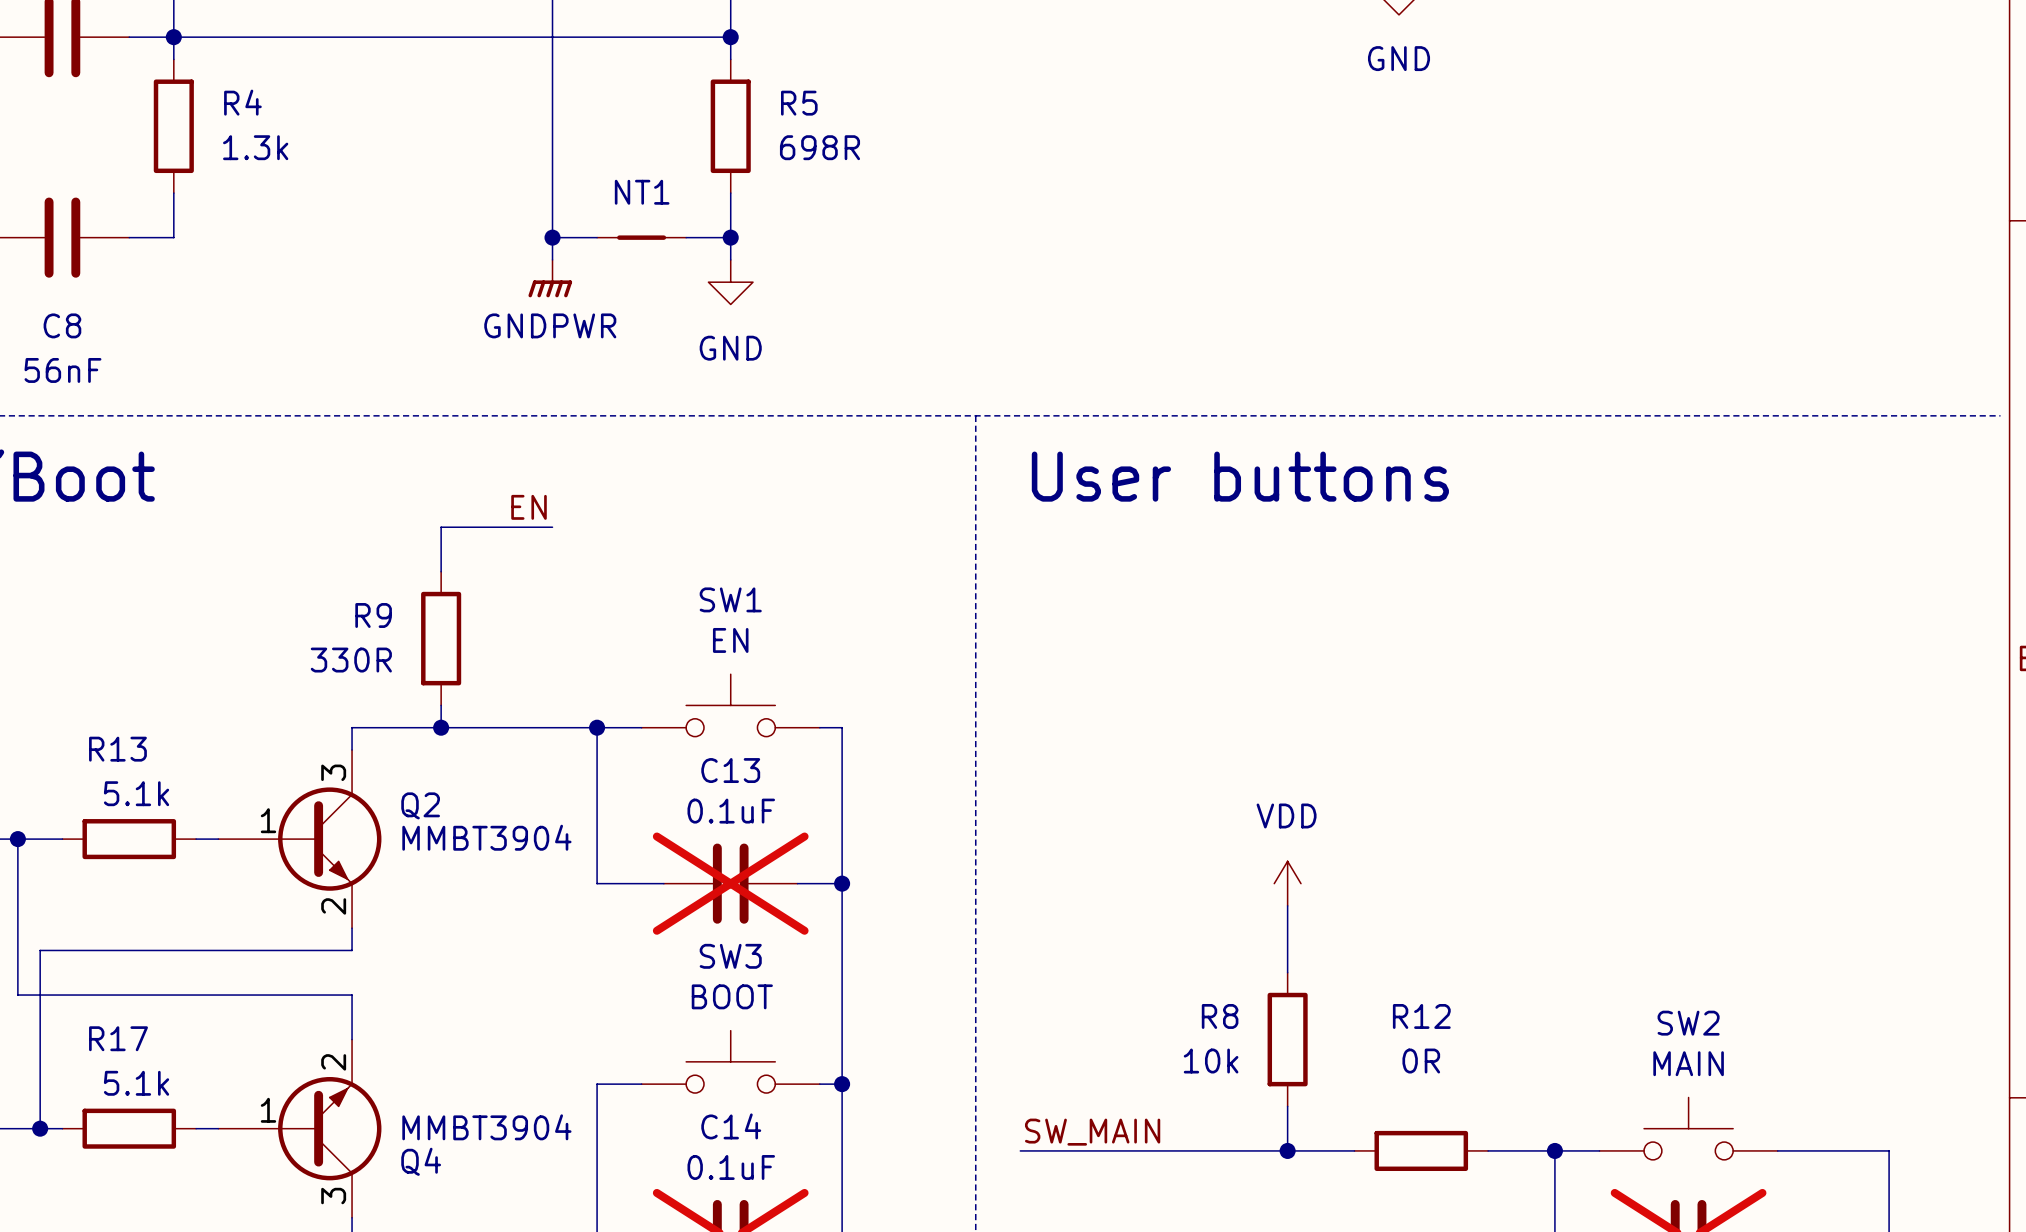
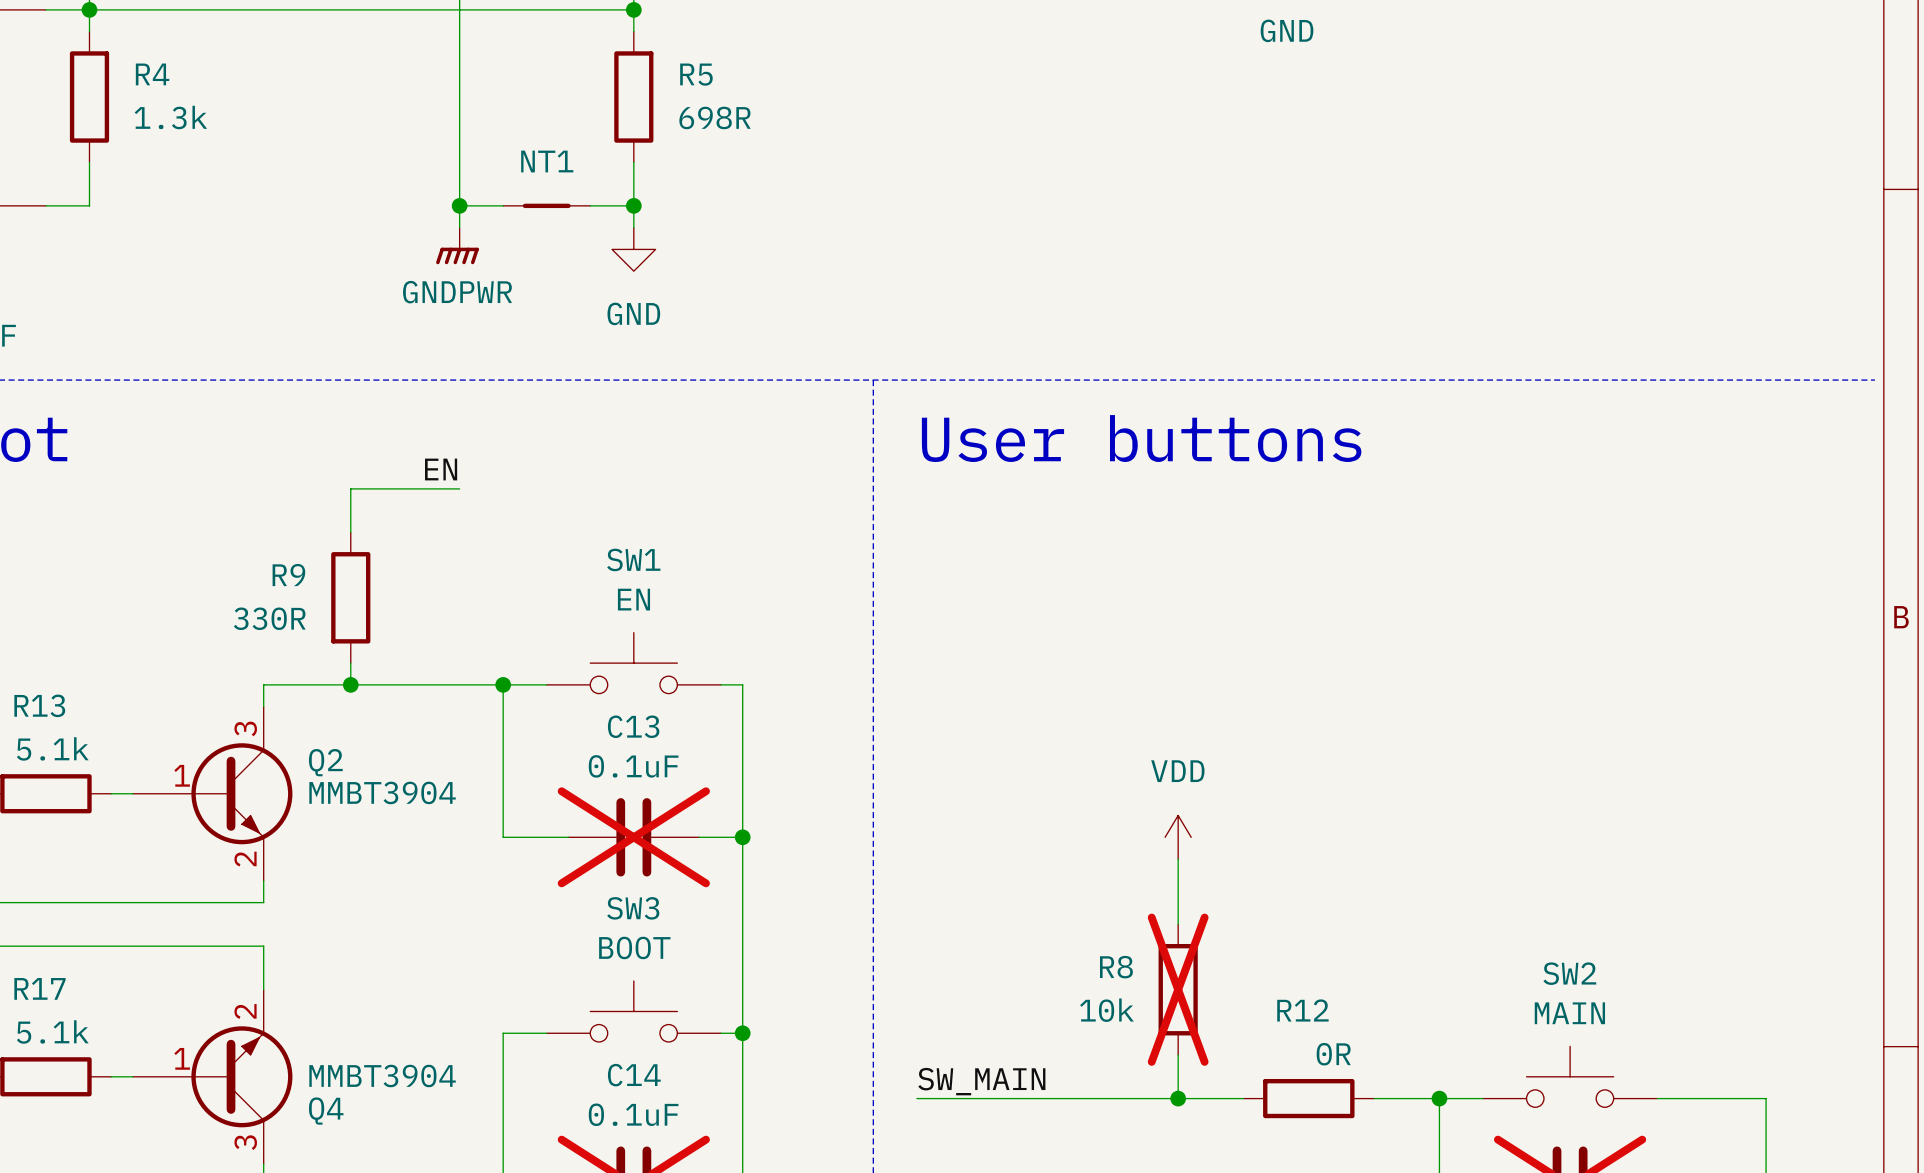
R12 name position: R12 (1421, 1016) -> R12 (1302, 1010)
R8 do-not-place cross: none -> (1178, 989)
R12 value position: 0R (1421, 1061) -> 0R (1333, 1054)

